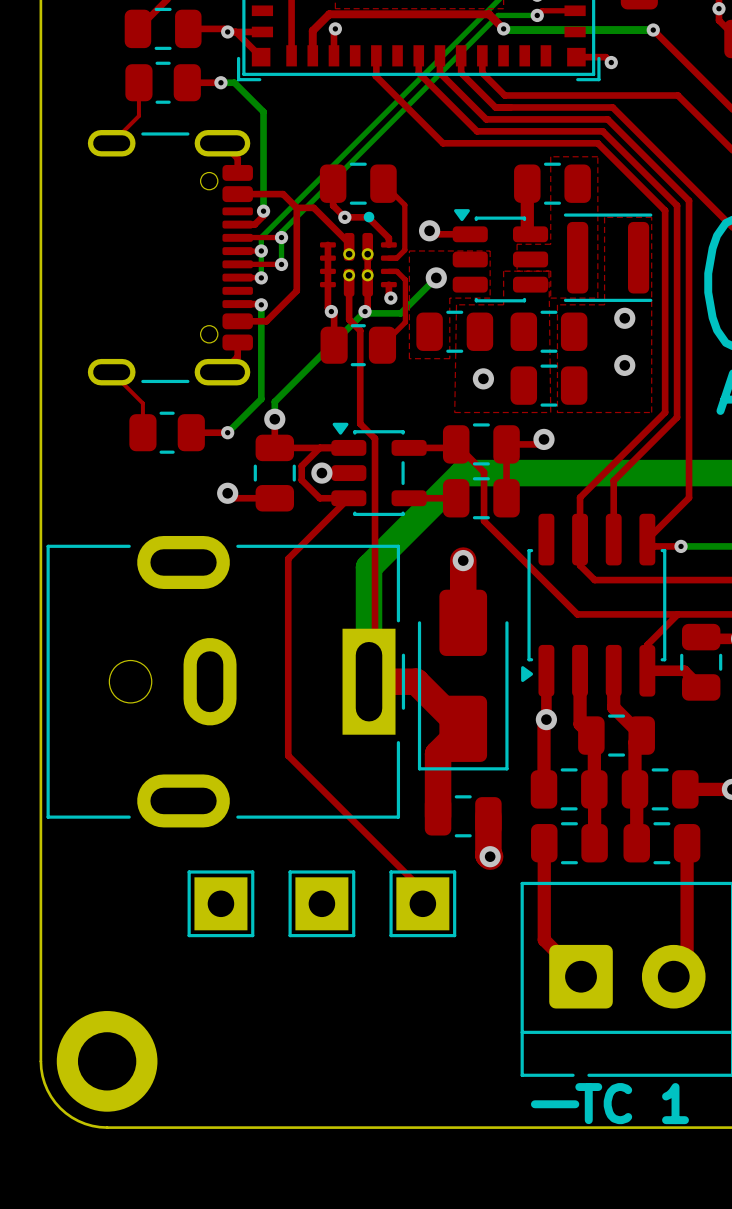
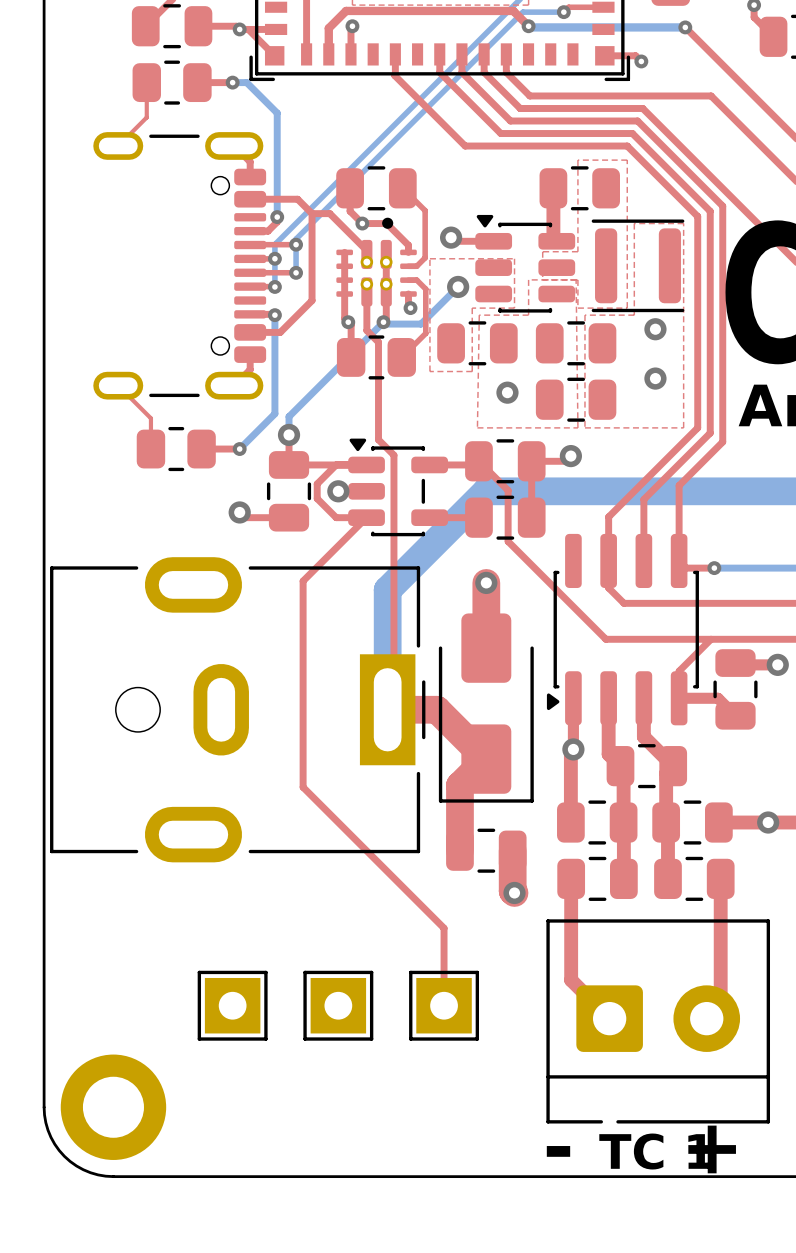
top track: (689, 425) (689, 497) (647, 539) -> (722, 441) (679, 485) (679, 560)
part: (220, 903) -> none
part: (321, 903) -> none
top track: none -> (444, 942) (444, 1005)
part: (422, 903) -> none
part: none -> (232, 1005)
part: none -> (338, 1005)
part: none -> (444, 1005)

